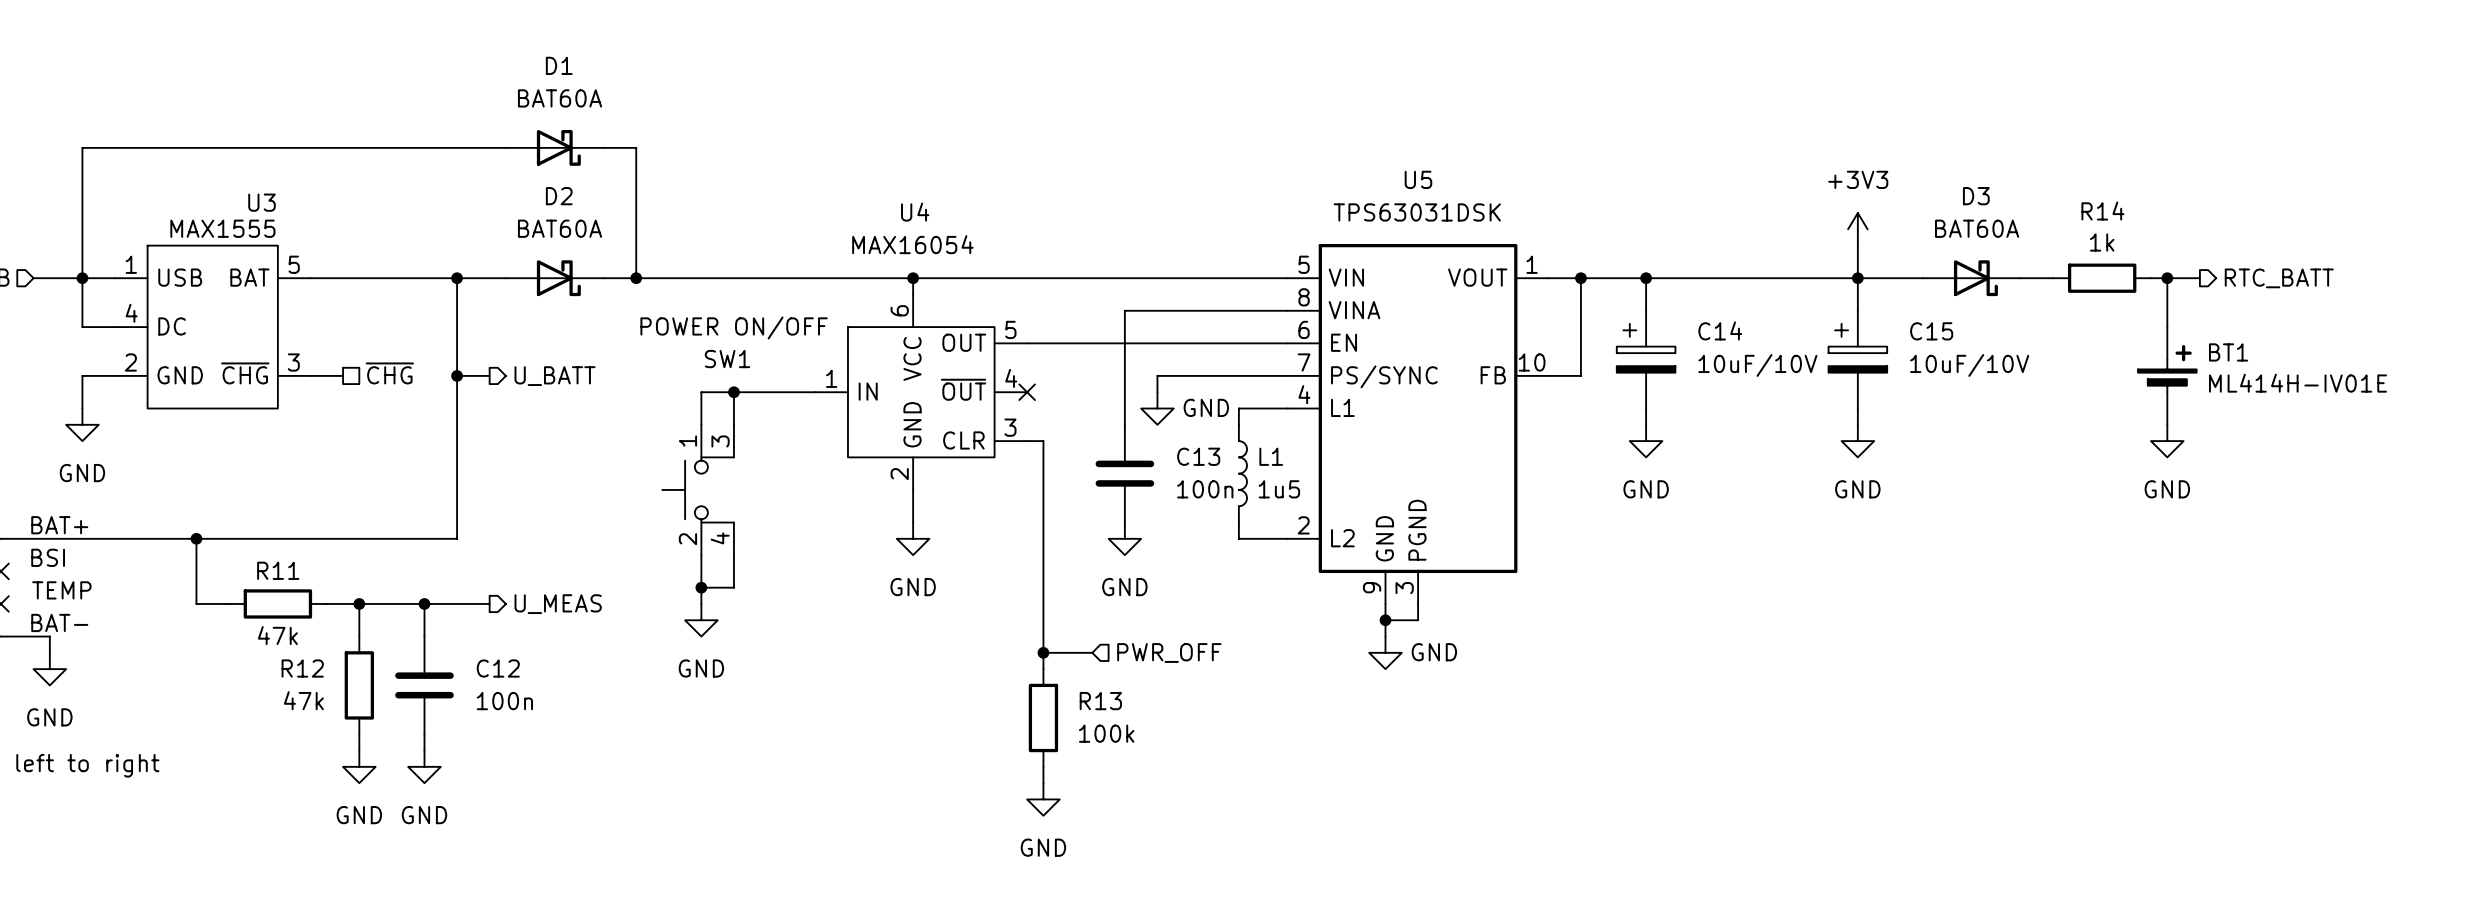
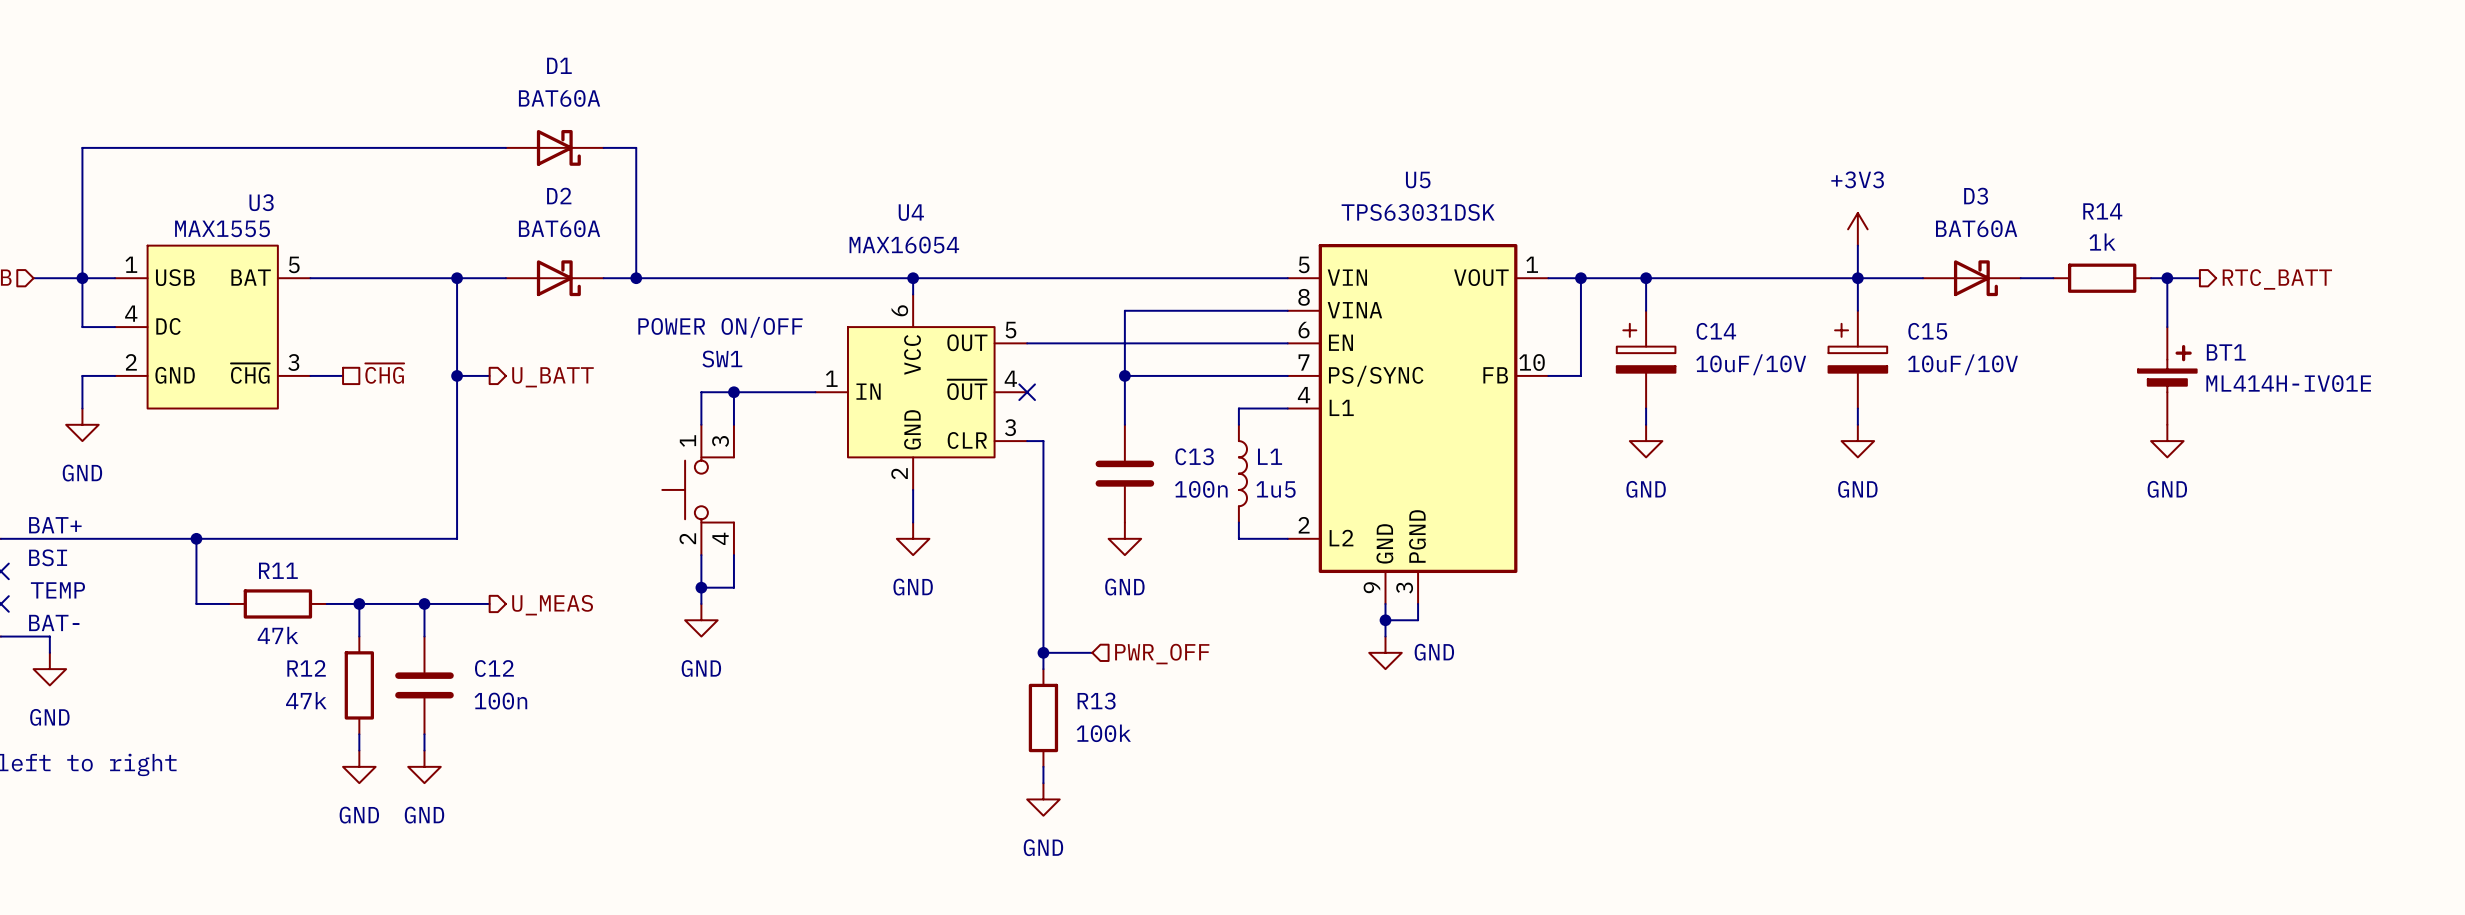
junction: none -> (1124, 375)
wire: (1157, 375) (1157, 392) -> (1157, 375) (1124, 375)
power symbol: GND (1157, 408) -> none

